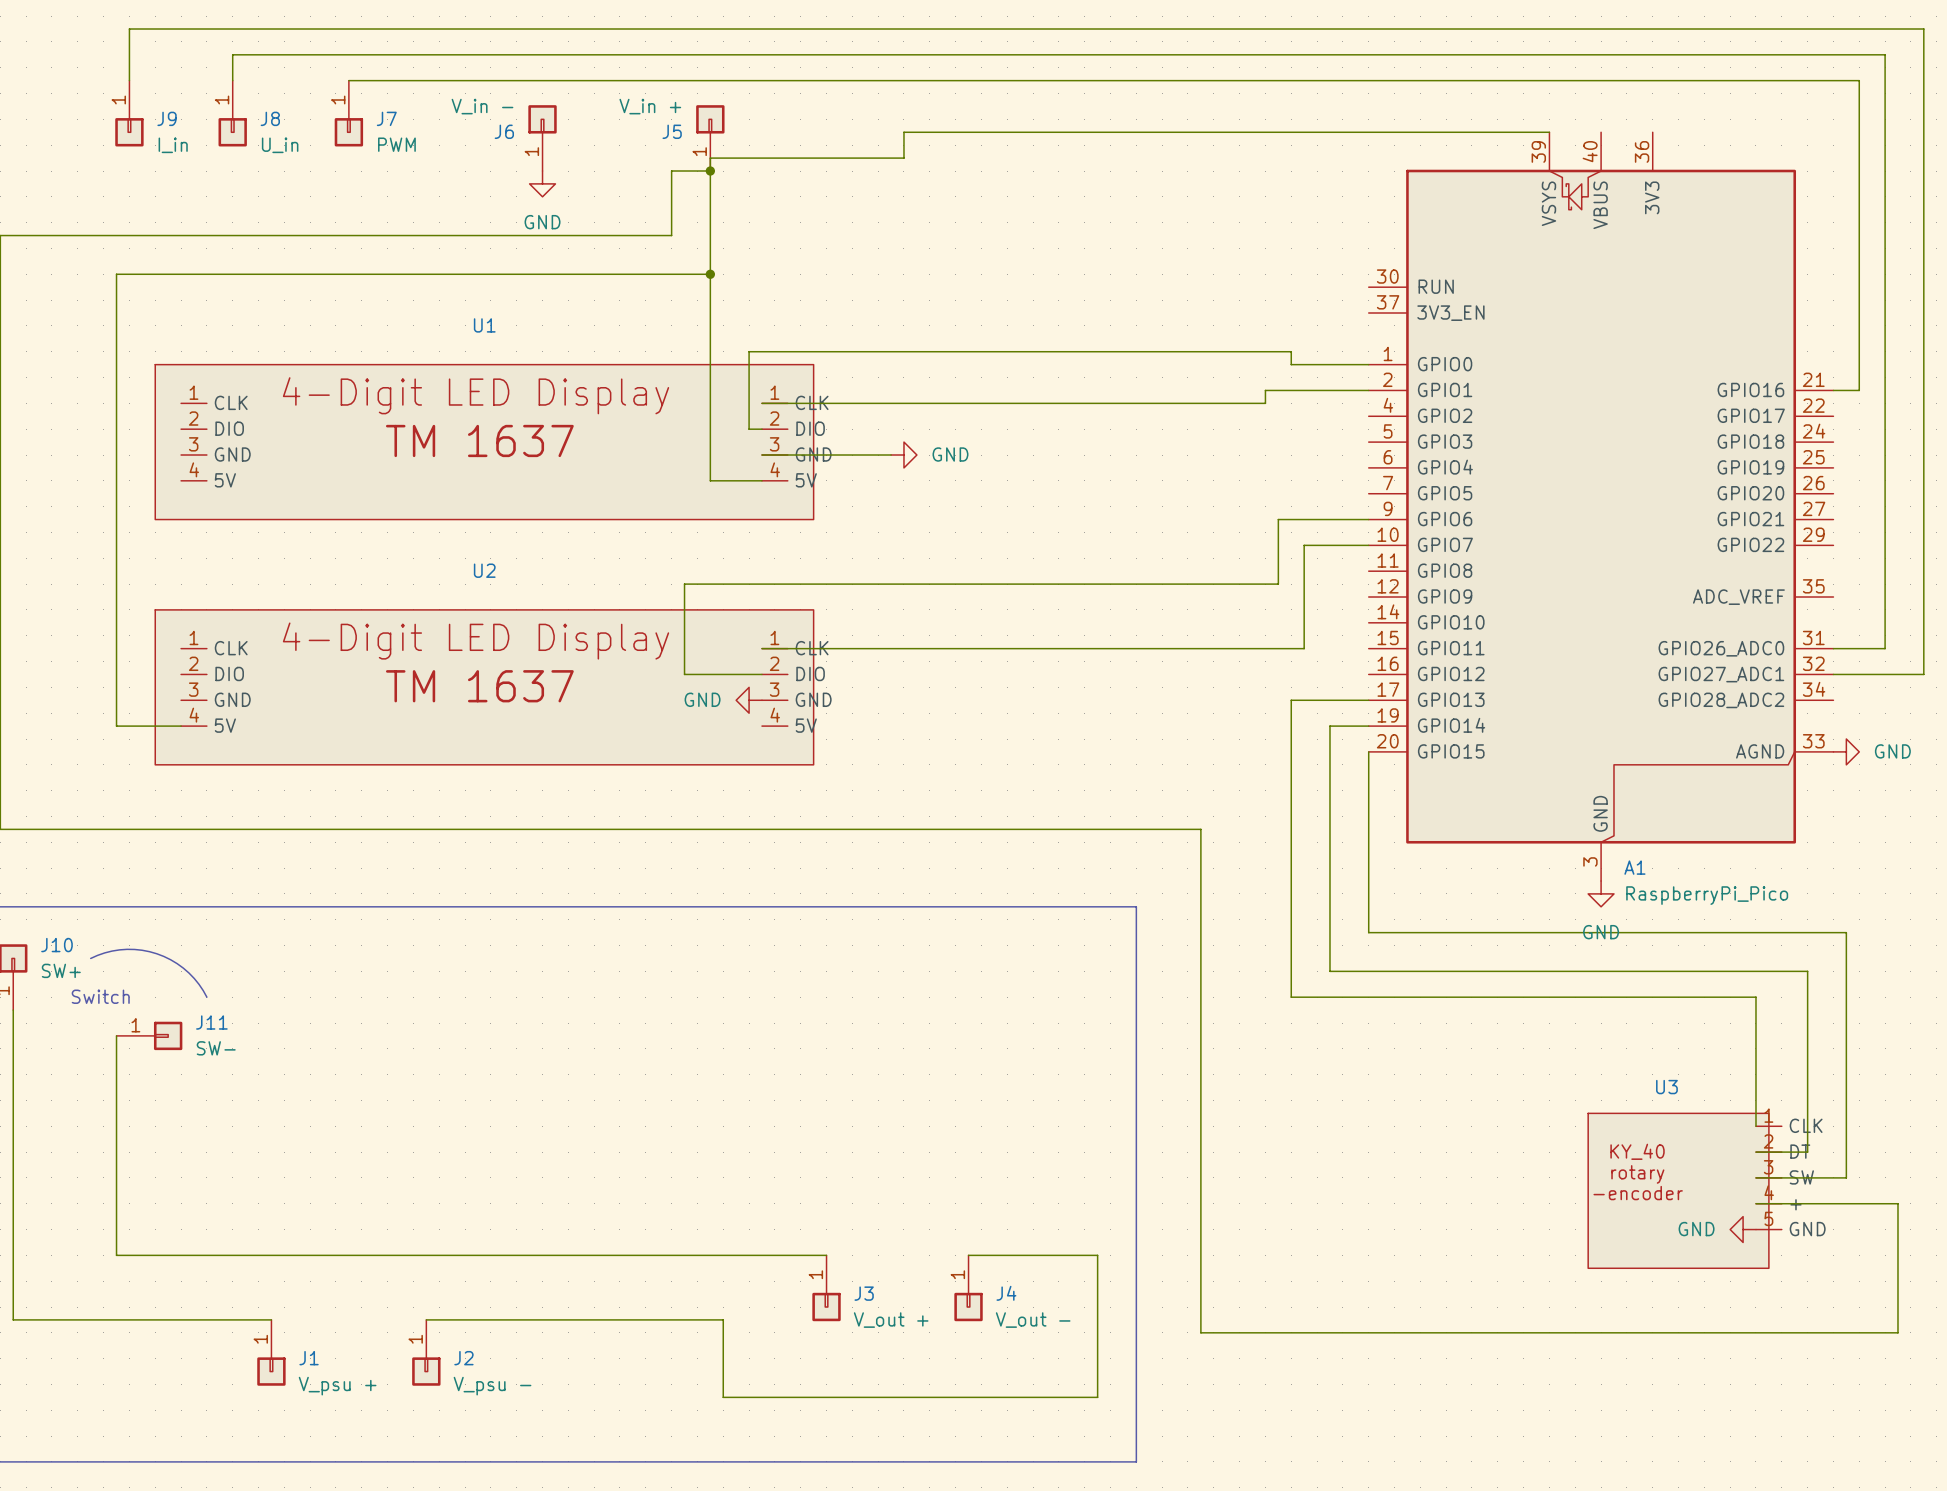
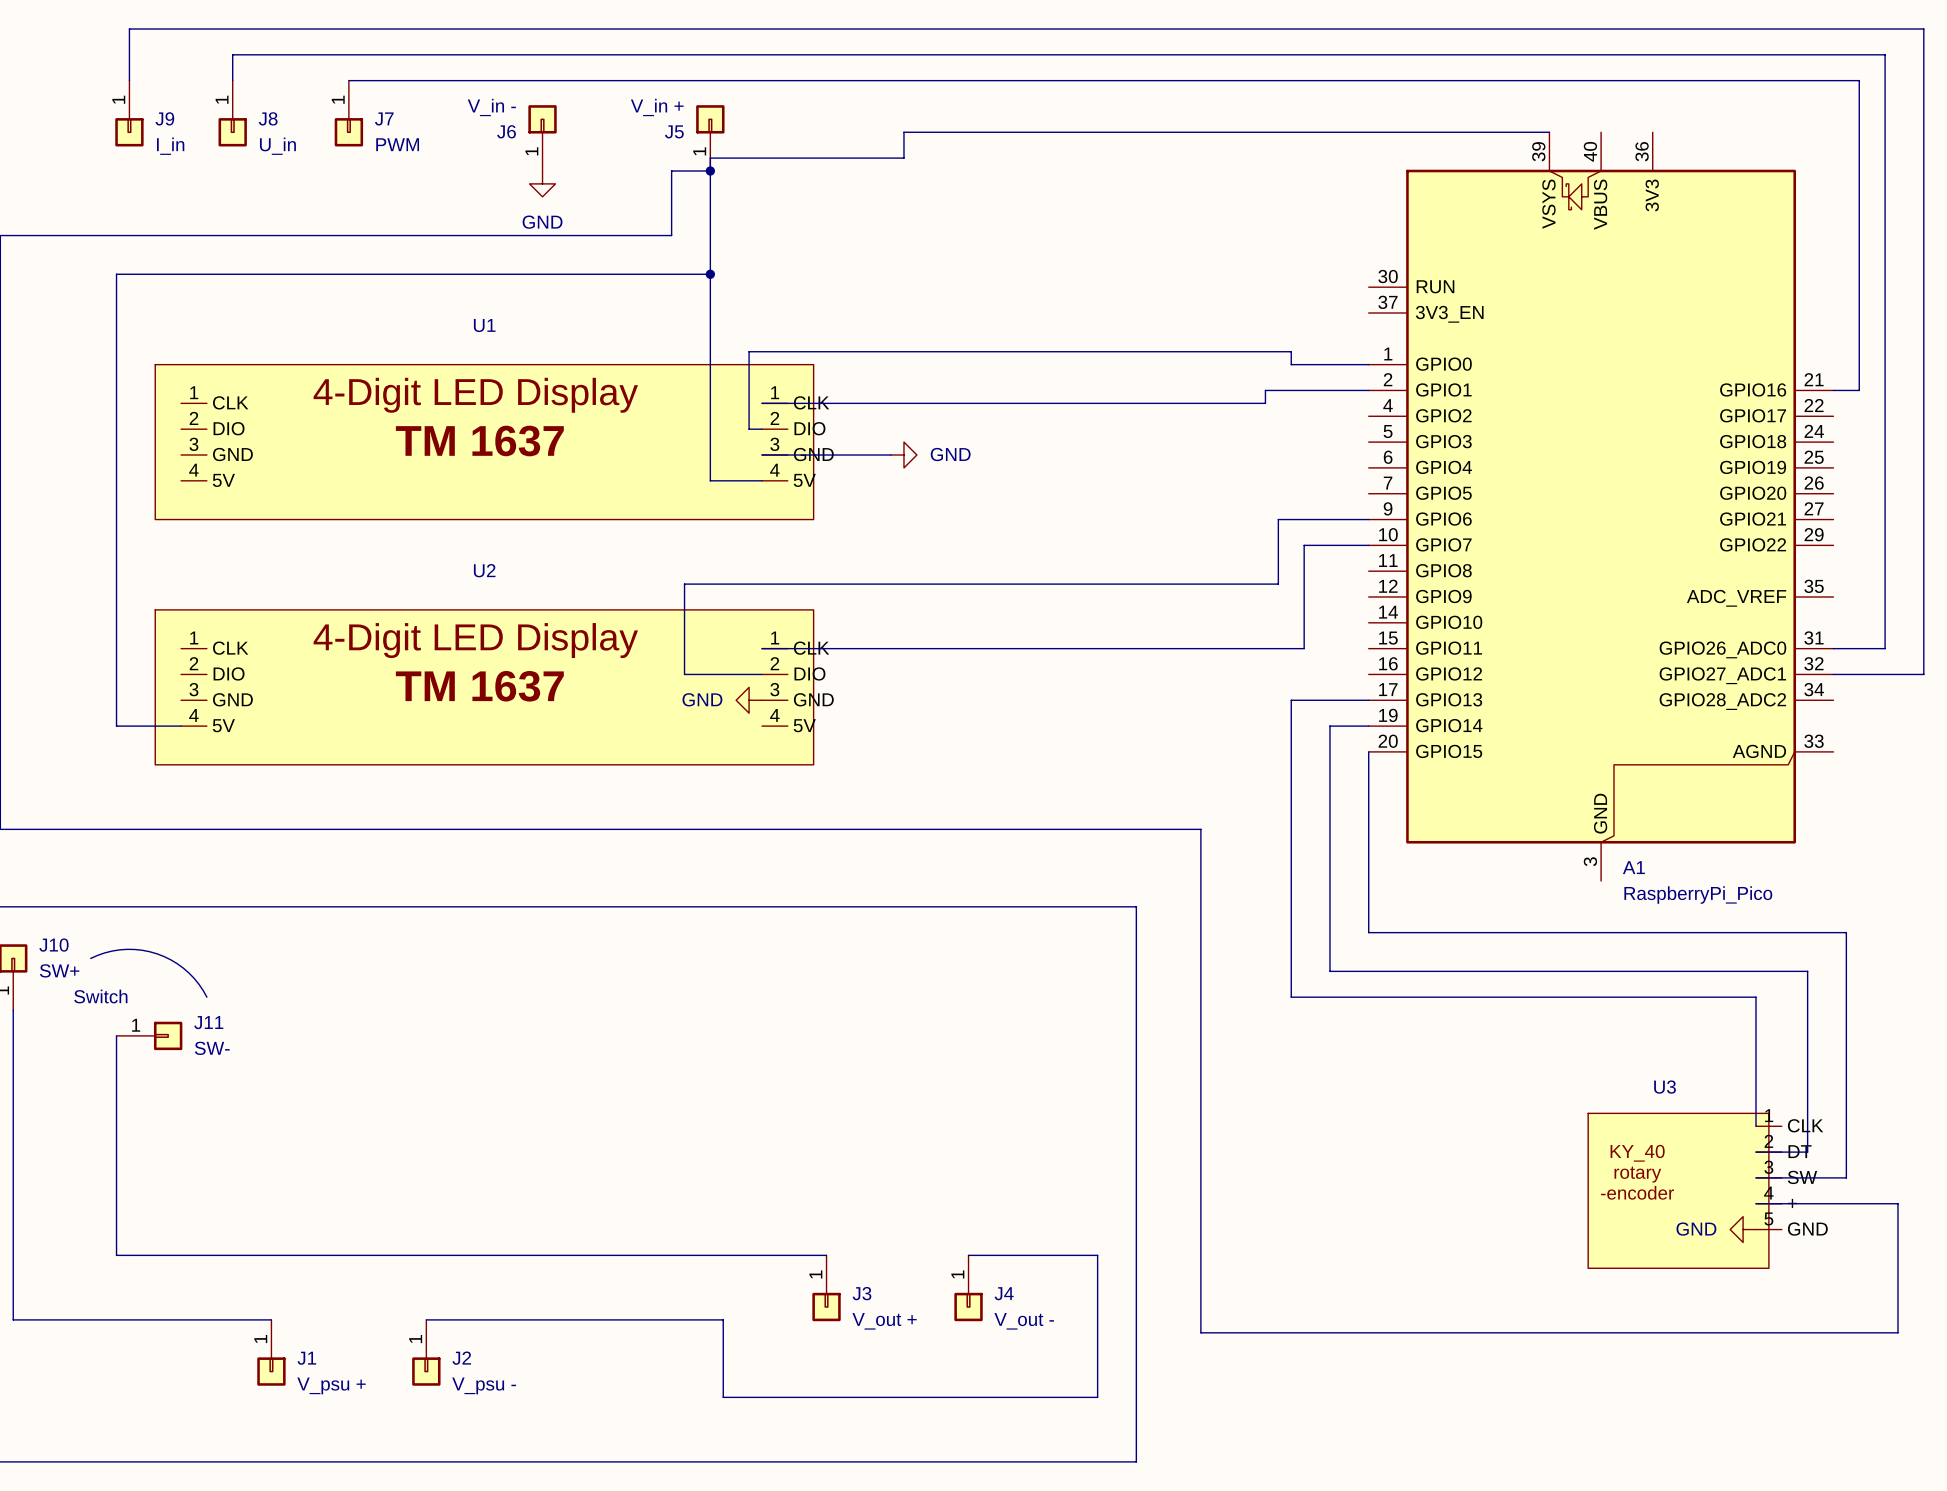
power symbol: GND (1846, 751) -> none
power symbol: GND (1601, 893) -> none

